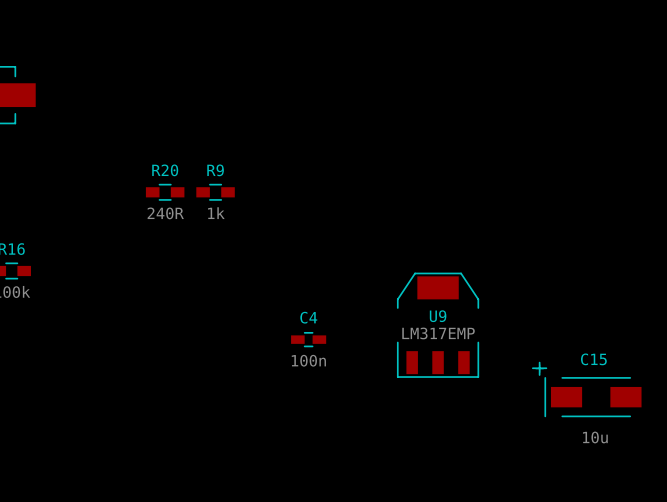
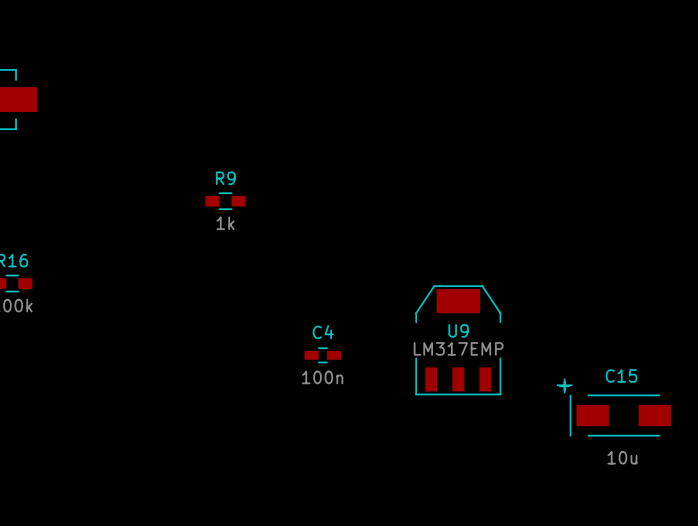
R20: 240R (165, 192) -> none

